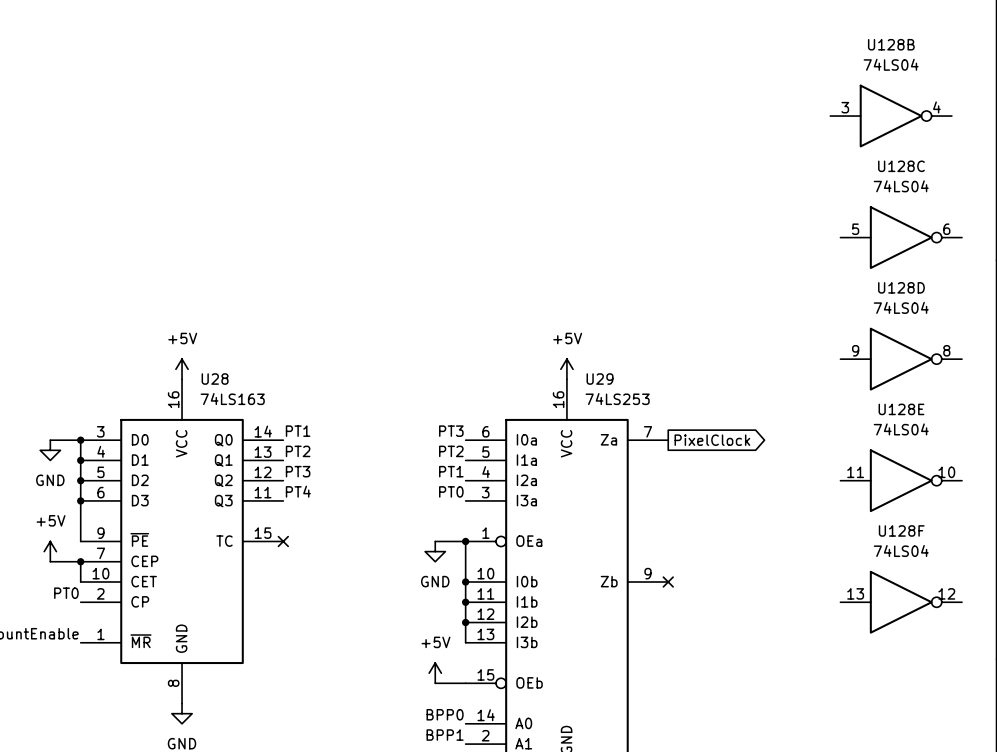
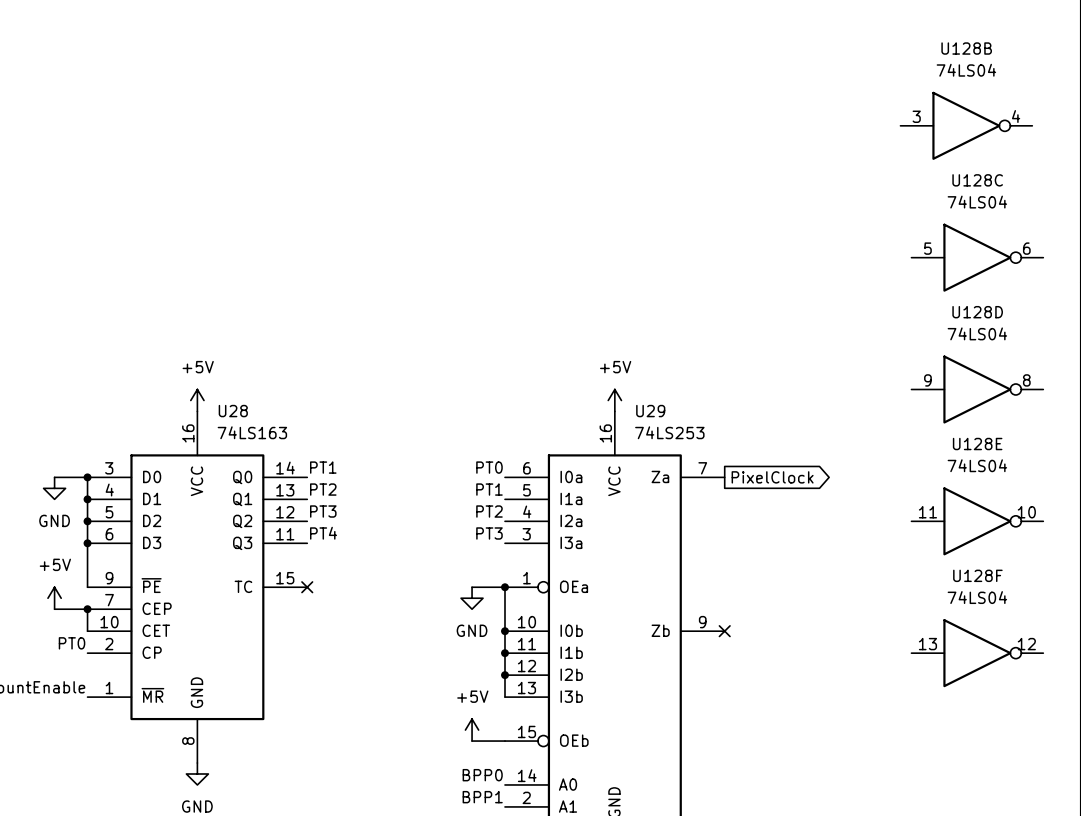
label: PT3 (451, 431) -> PT0 (489, 467)
label: PT2 (451, 451) -> PT1 (489, 489)
label: PT1 (451, 471) -> PT2 (489, 511)
label: PT0 (451, 491) -> PT3 (489, 533)

